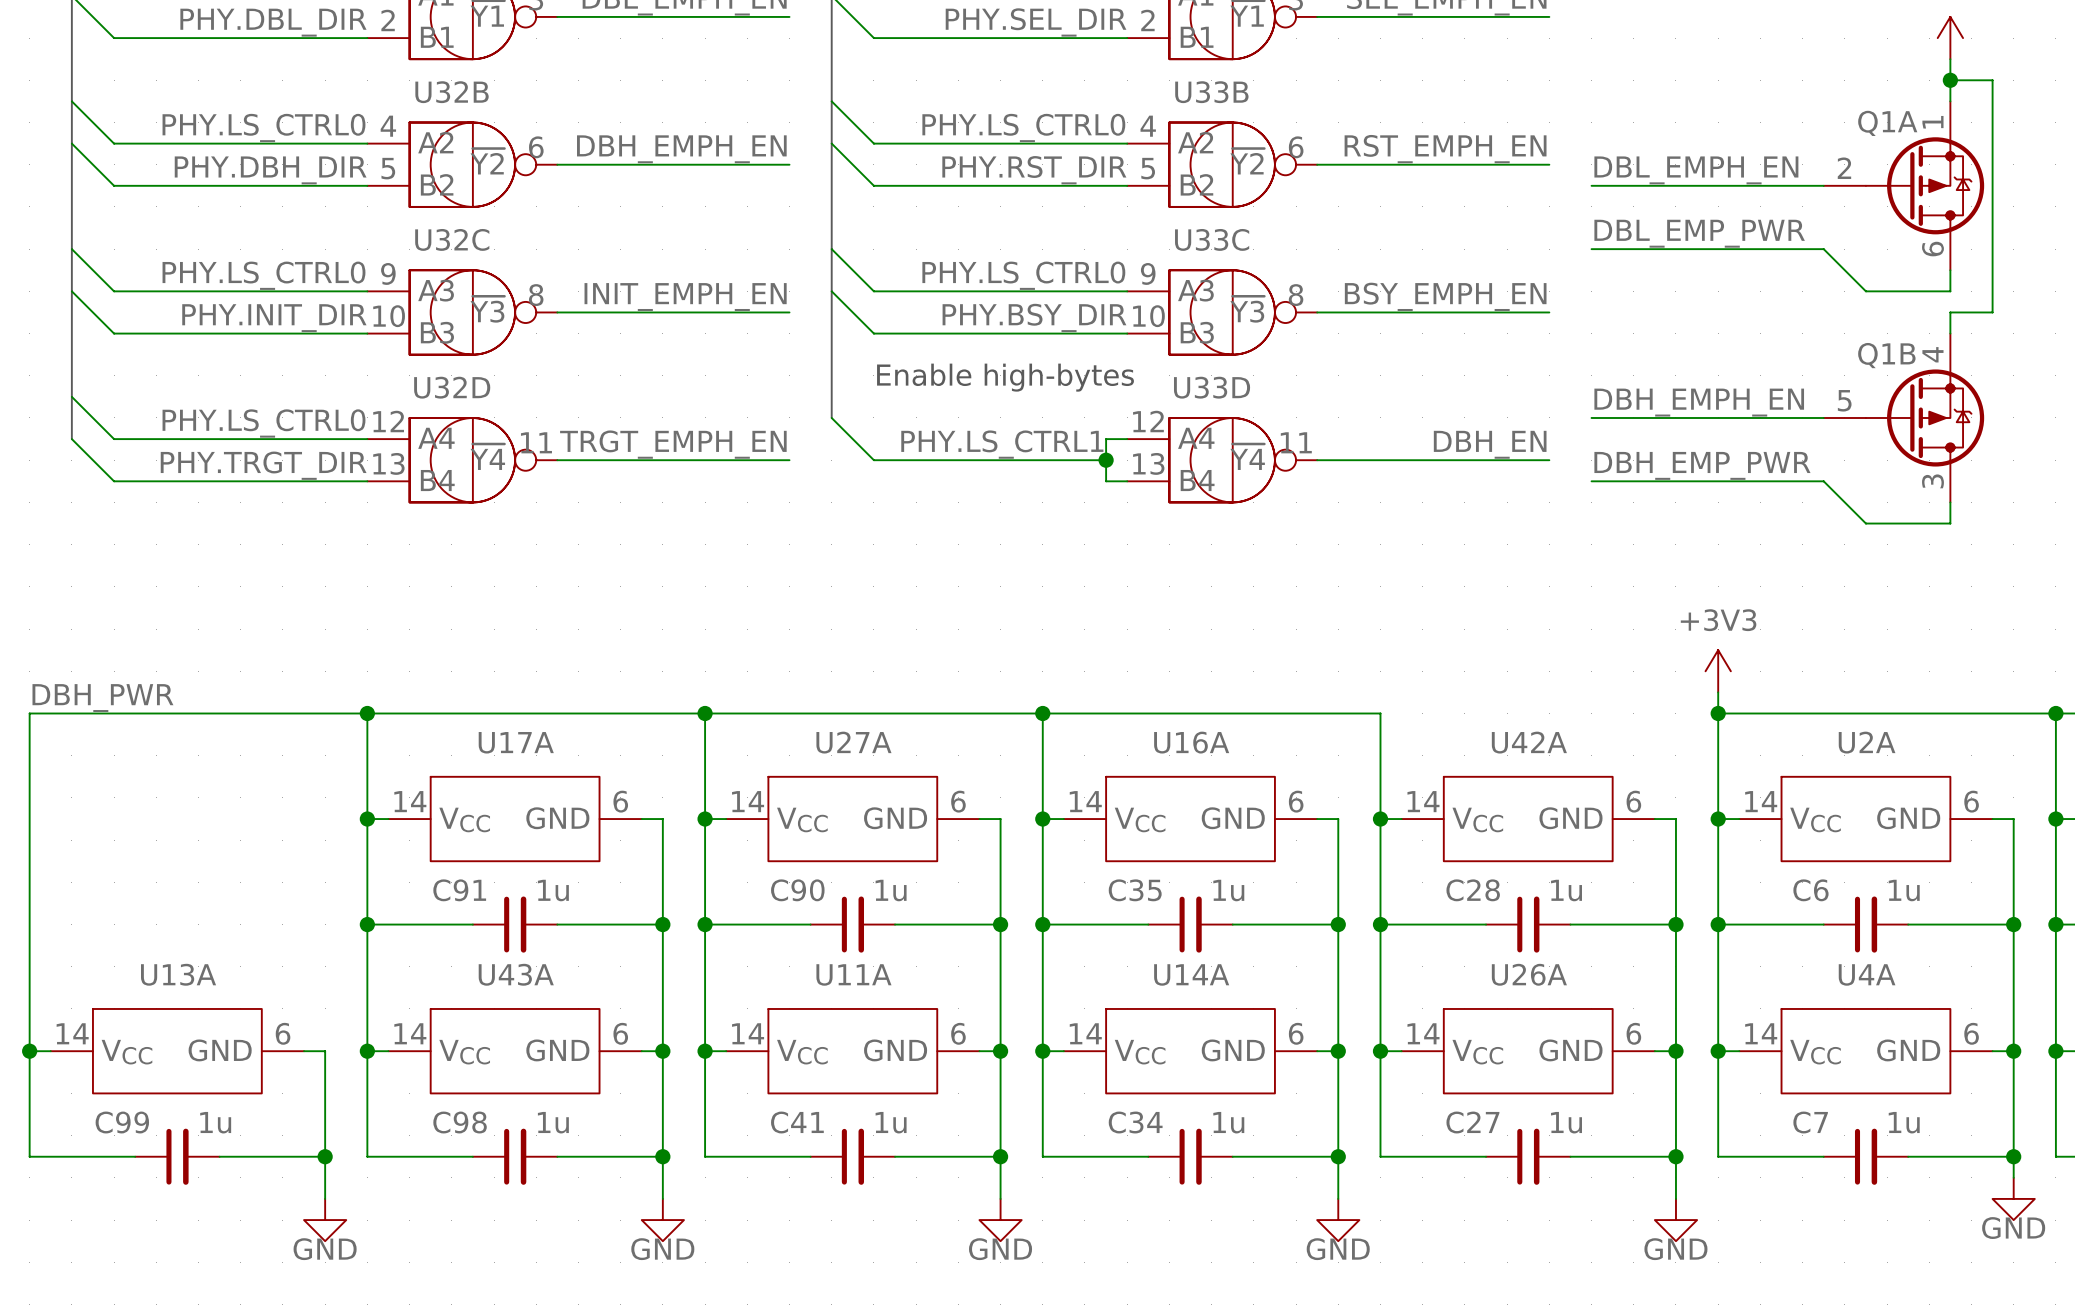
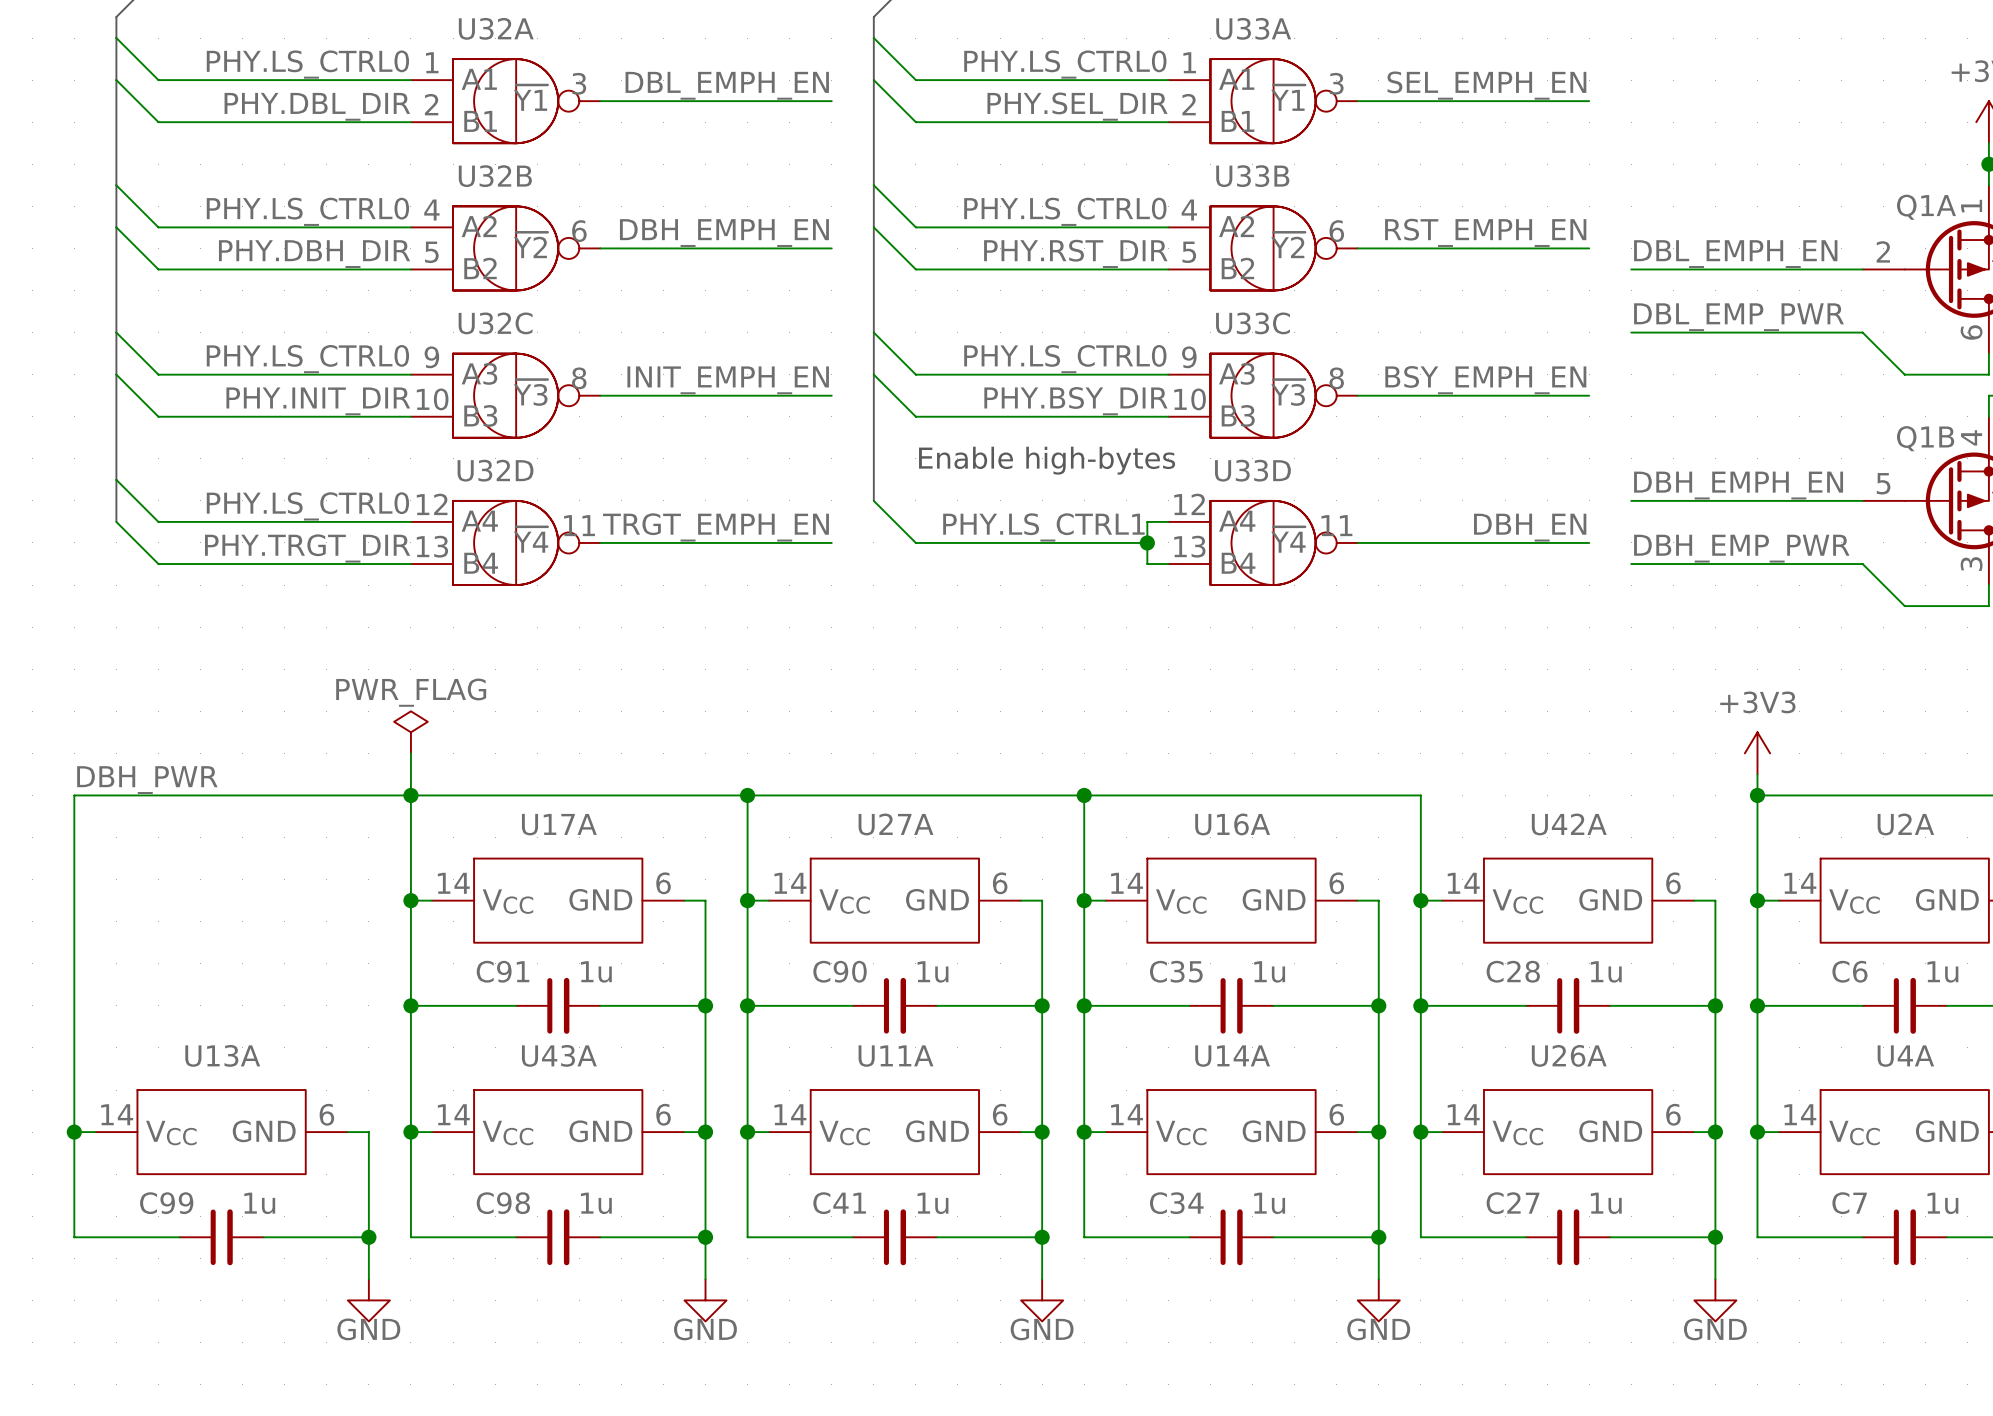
power symbol: none -> PWR_FLAG (410, 732)
wire: none -> (410, 753) (410, 795)

